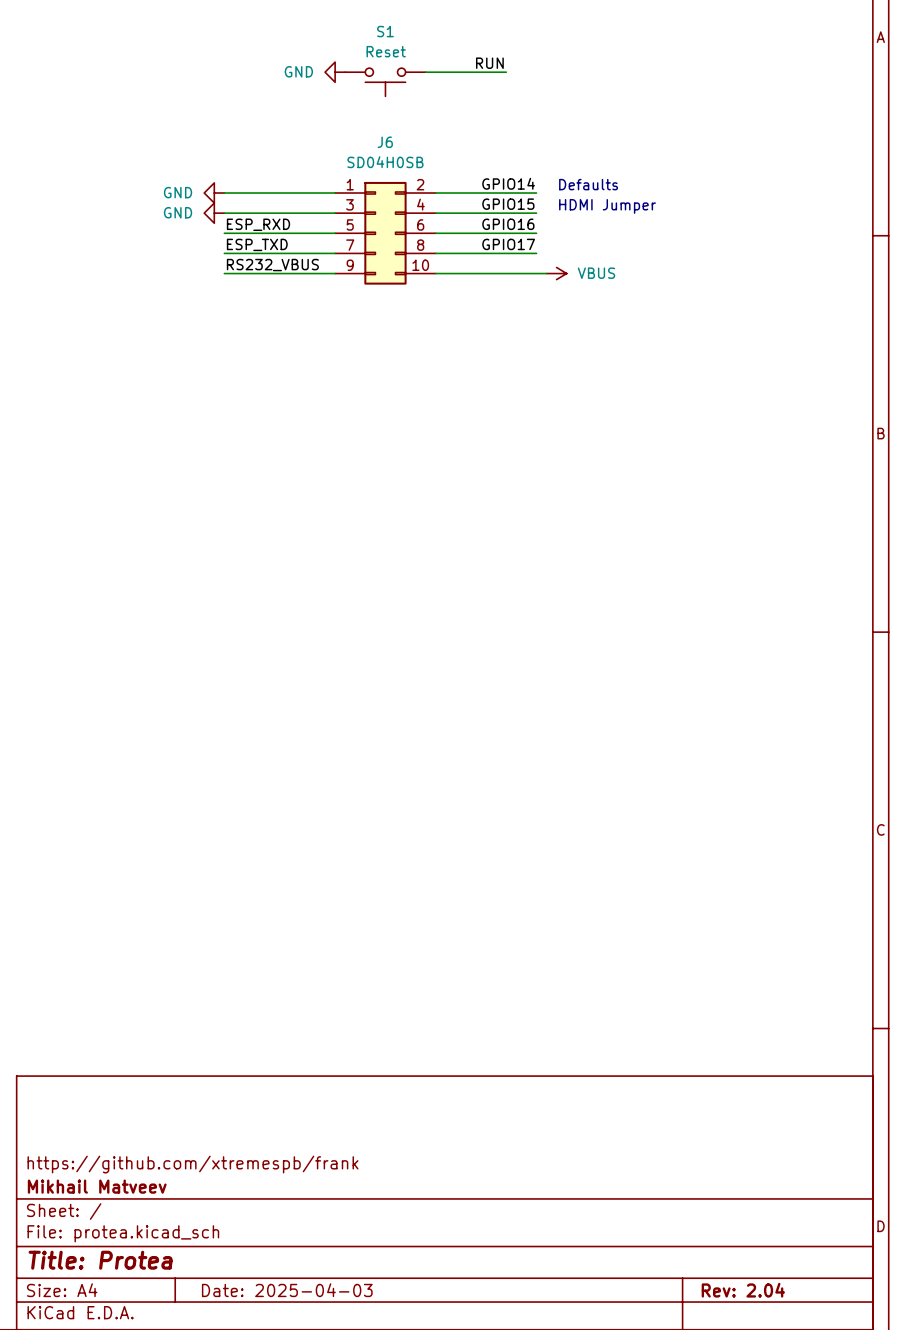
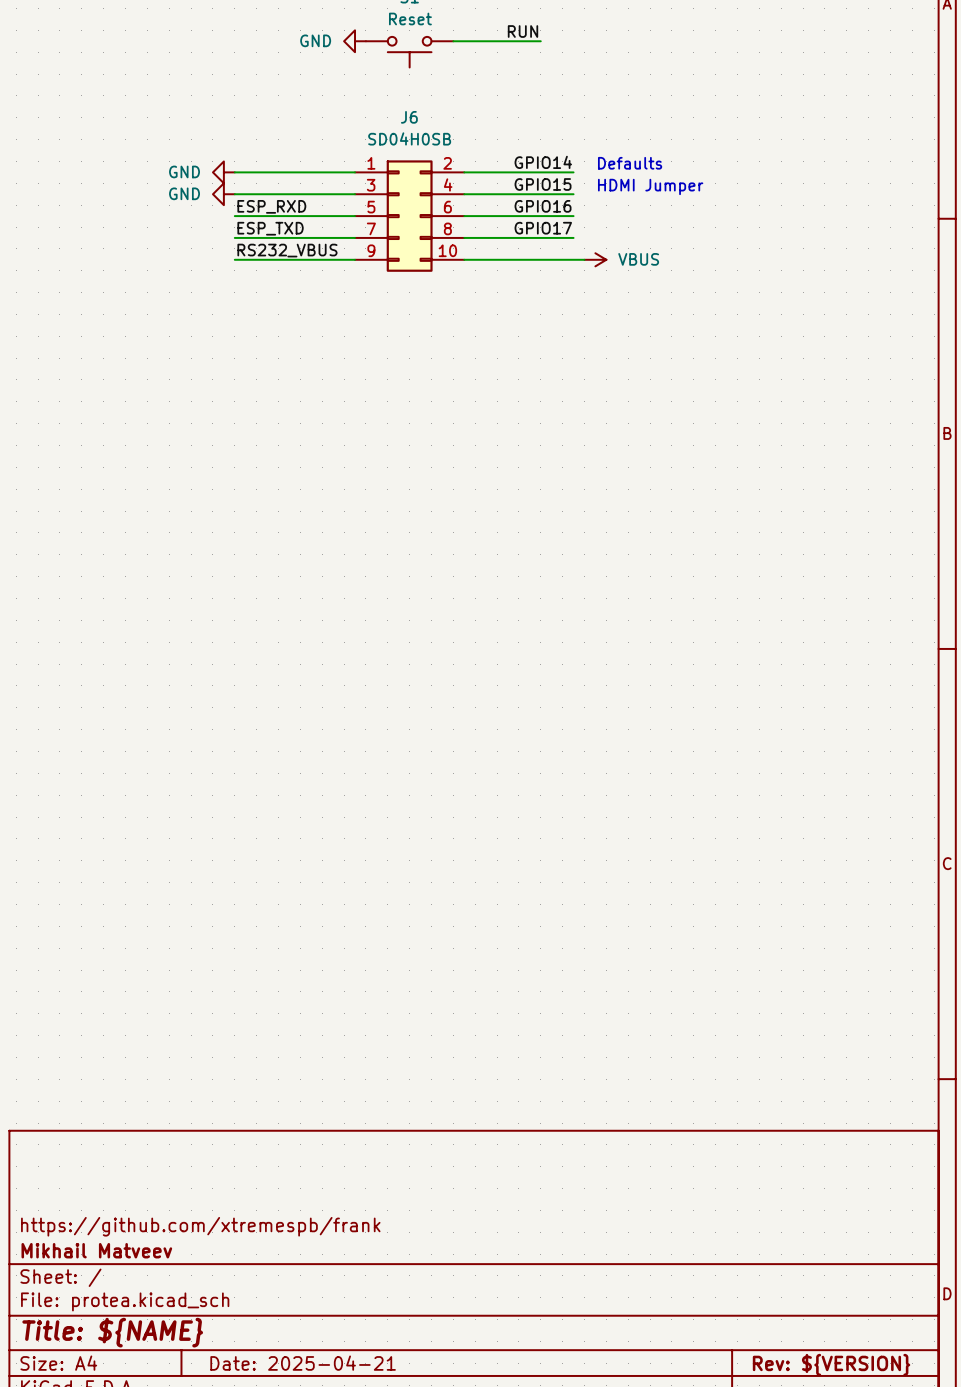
title block: Title: Protea (100, 1260) -> Title: ${NAME} (112, 1332)
title block: Date: 2025-04-03 (287, 1290) -> Date: 2025-04-21 (303, 1363)
title block: Rev: 2.04 (743, 1290) -> Rev: ${VERSION} (831, 1364)

